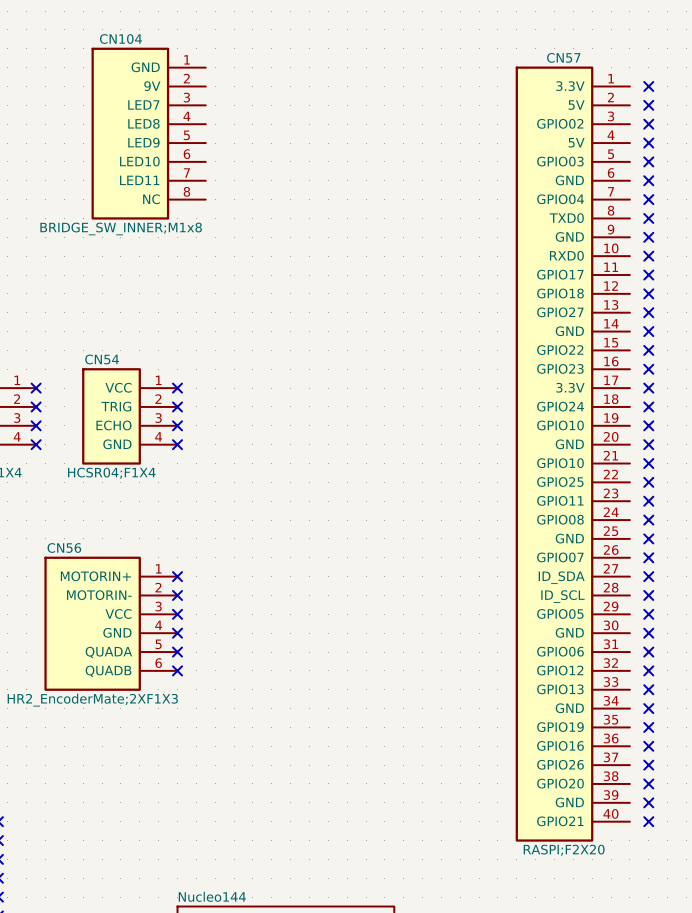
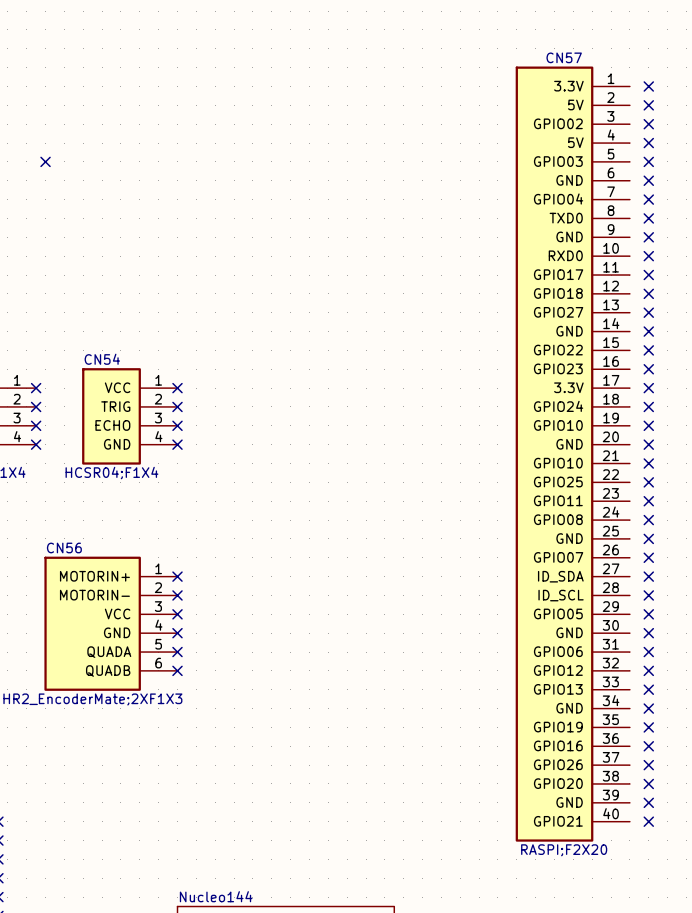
CN104: BRIDGE_SW_INNER;M1x8 (148, 133) -> none
no-connect mark: none -> (45, 161)

